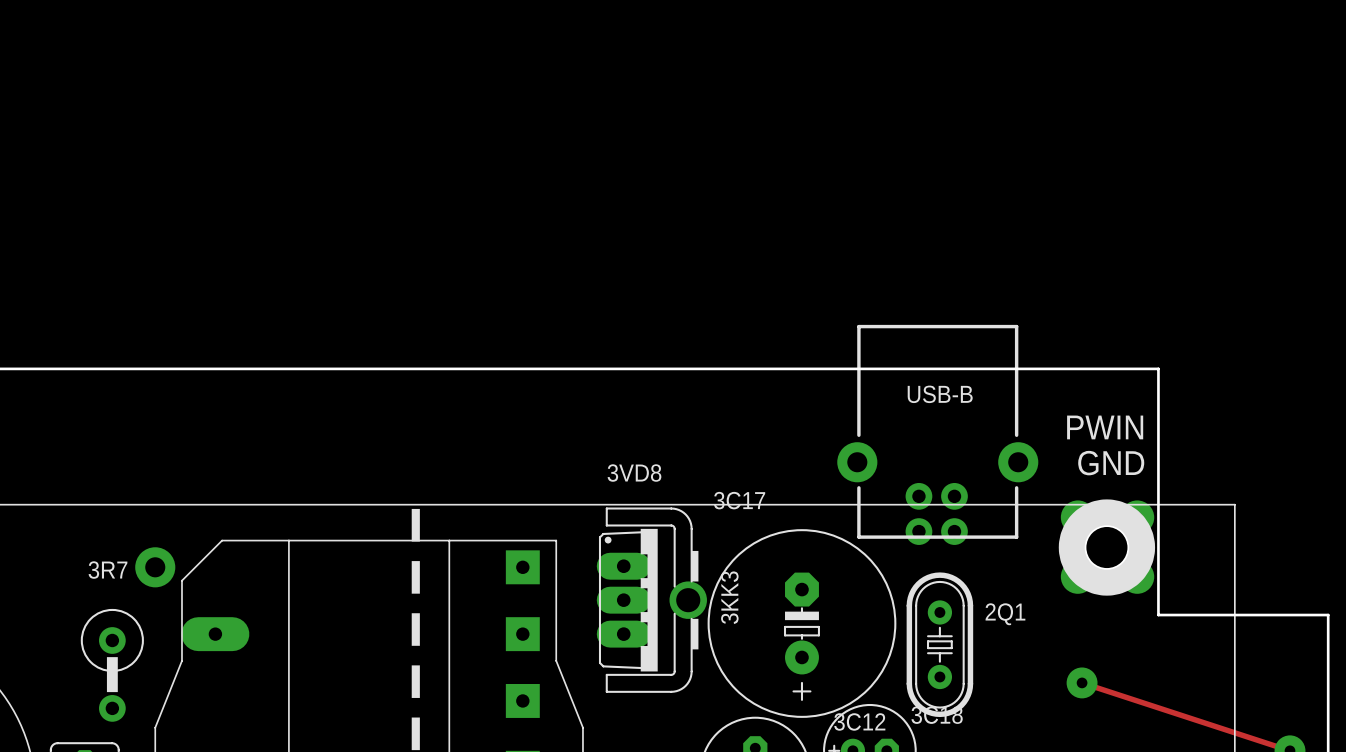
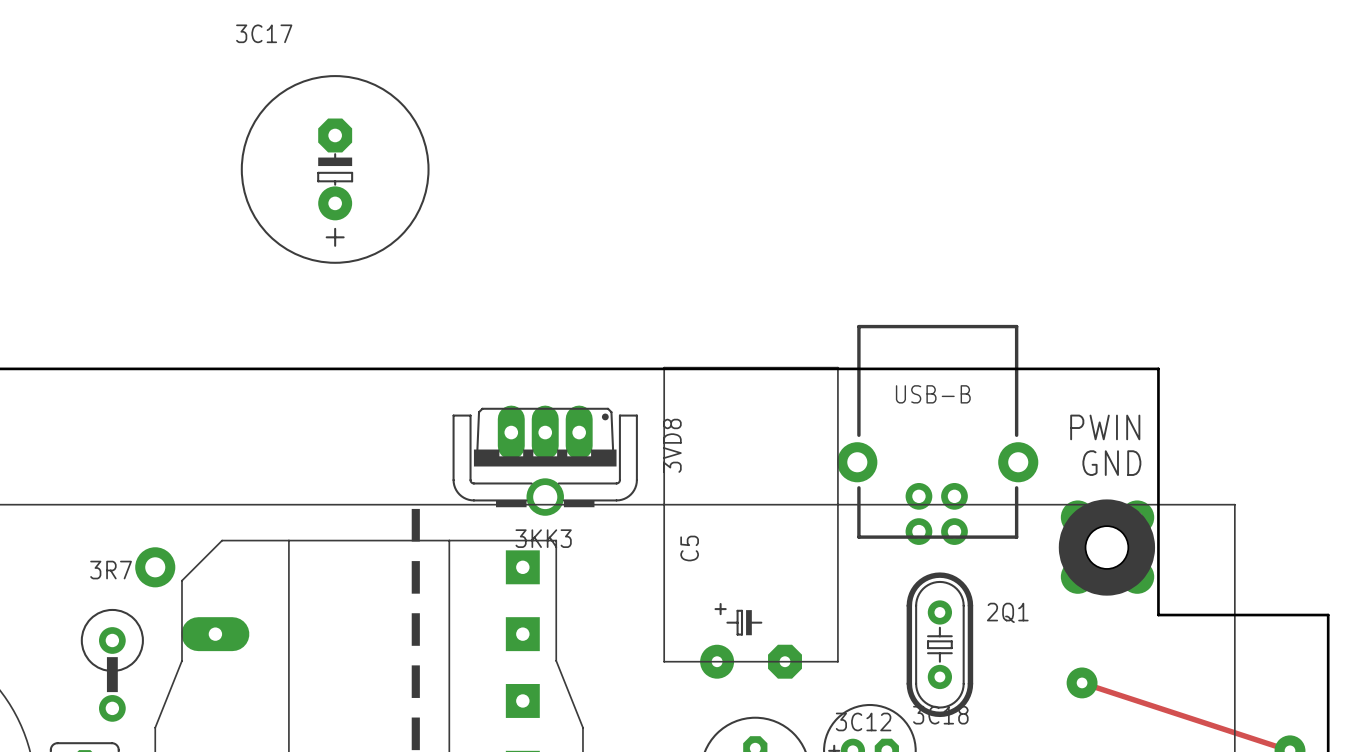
3C17 name position: 3C17 (739, 500) -> 3C17 (264, 33)
C5: none -> (751, 522)
3VD8 rotation: 0° (627, 600) -> 90° clockwise (545, 436)
3VD8 position: (627, 600) -> (545, 436)
3KK3 rotation: 0° (656, 600) -> 90° clockwise (545, 465)
3KK3 position: (656, 600) -> (545, 465)
3C17 position: (801, 623) -> (335, 169)

